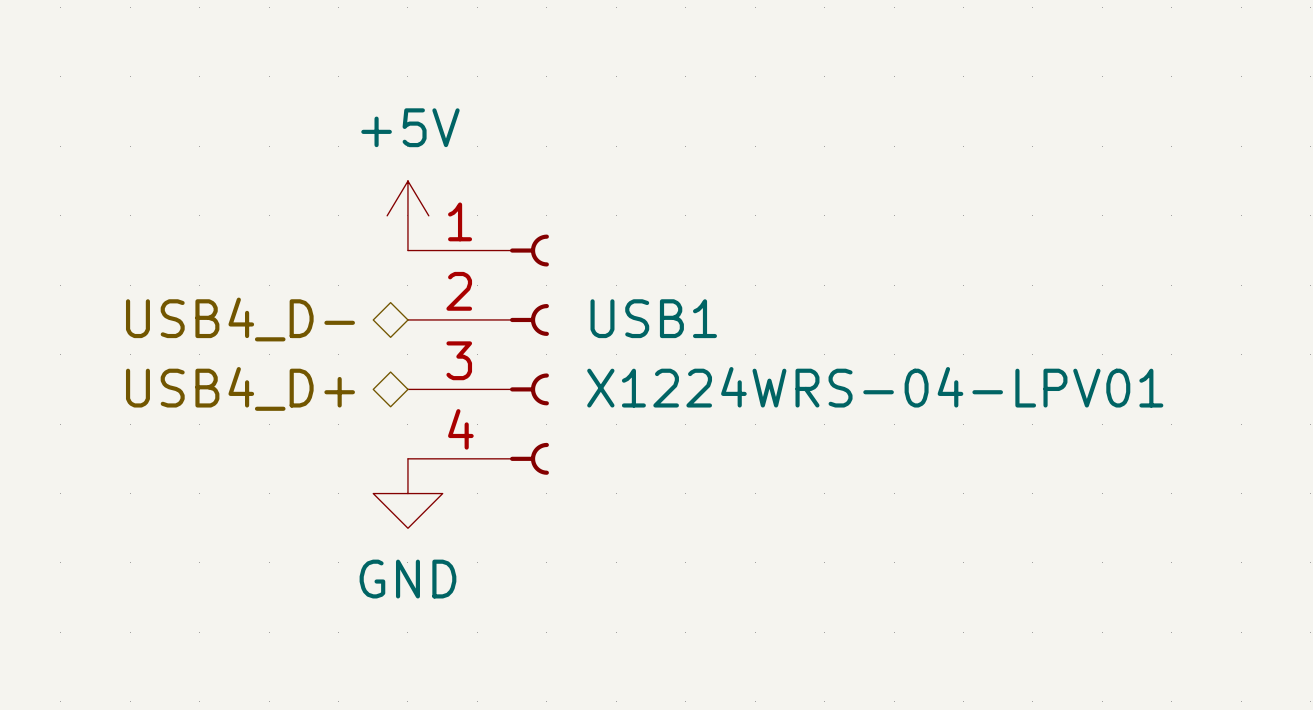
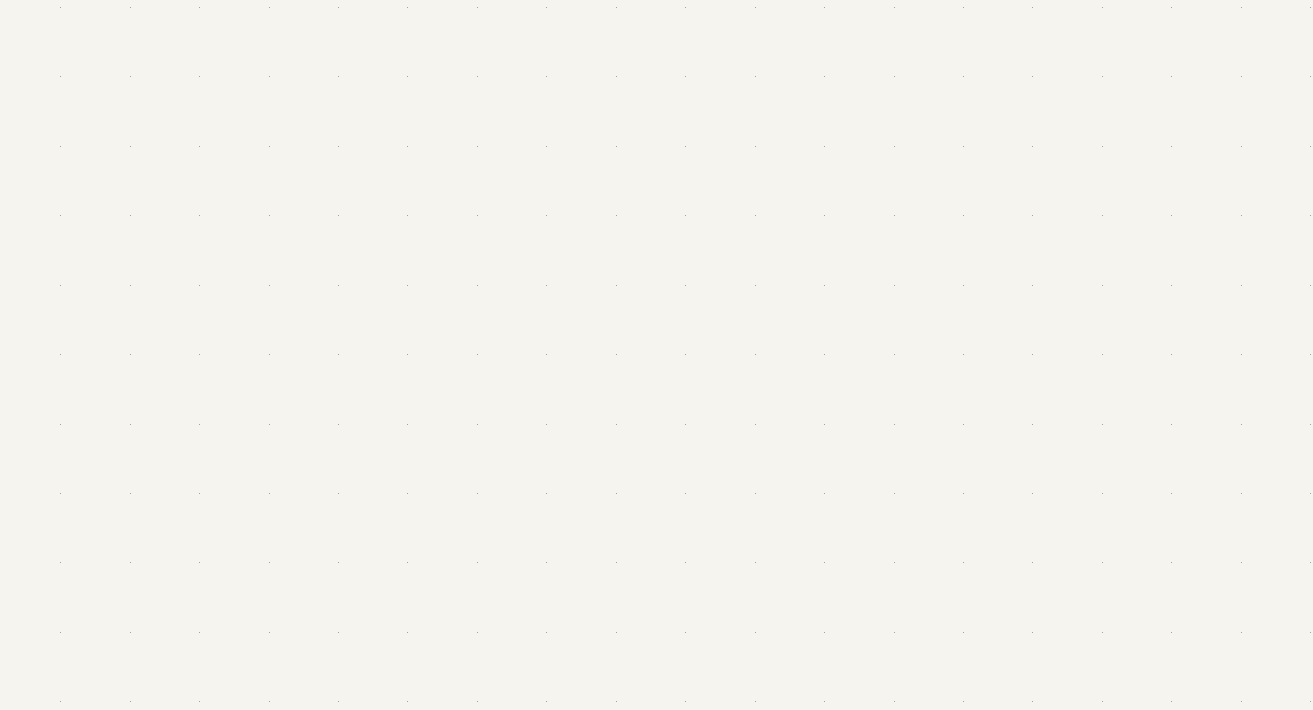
power symbol: +5V (407, 215) -> none
hierarchical label: USB4_D- (240, 319) -> none
USB1: X1224WRS-04-LPV01 (478, 354) -> none
hierarchical label: USB4_D+ (240, 388) -> none
power symbol: GND (407, 493) -> none

